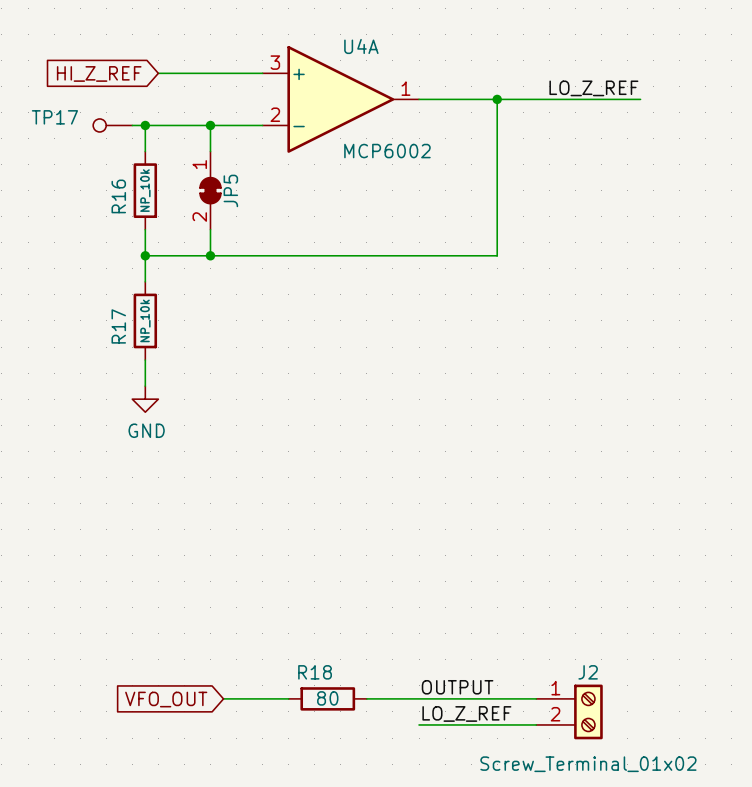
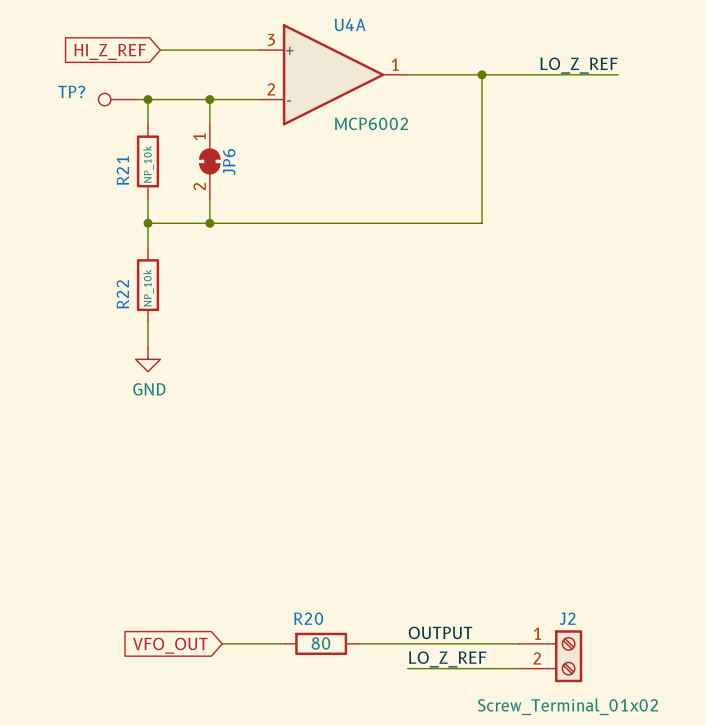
TP17 name: TP17 (54, 117) -> TP? (71, 91)
JP5 name: JP5 (230, 190) -> JP6 (229, 162)
R16 name: R16 (118, 196) -> R21 (122, 170)
R17 name: R17 (118, 326) -> R22 (122, 294)
R18 name: R18 (315, 672) -> R20 (308, 618)

